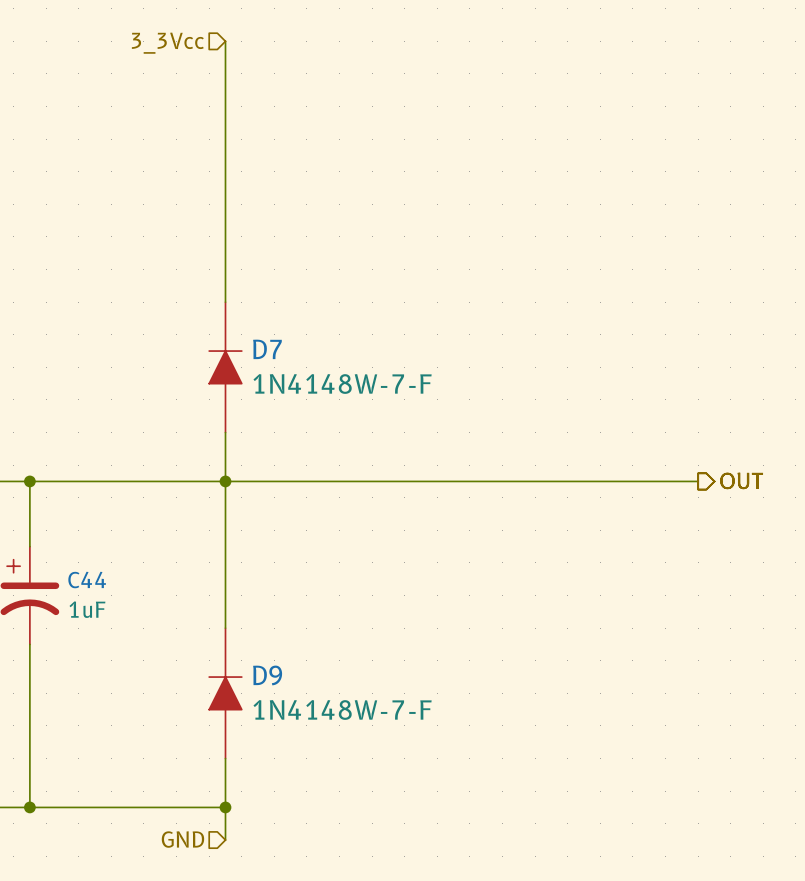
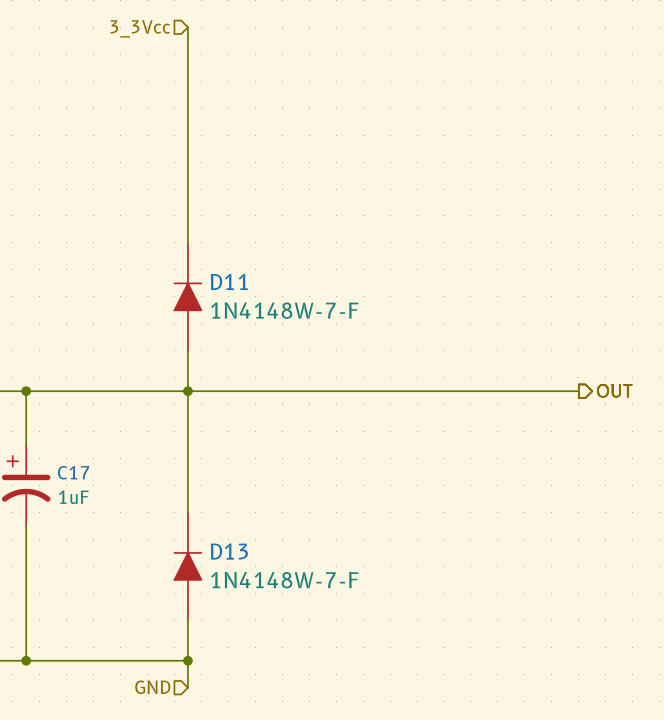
D7 name: D7 (267, 349) -> D11 (229, 281)
C44 name: C44 (87, 580) -> C17 (73, 472)
D9 name: D9 (267, 675) -> D13 (229, 551)

